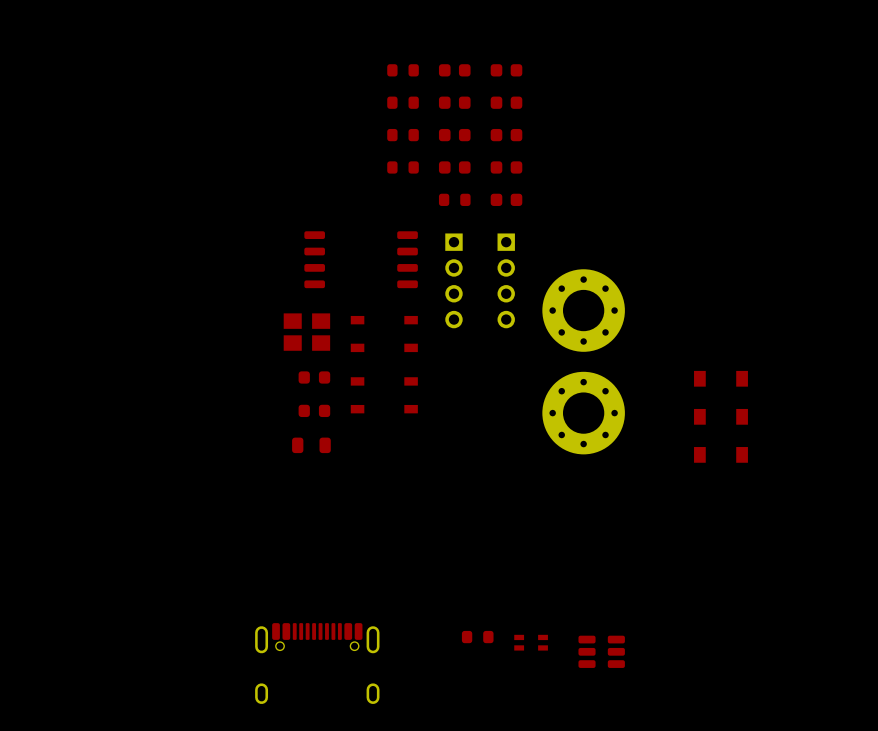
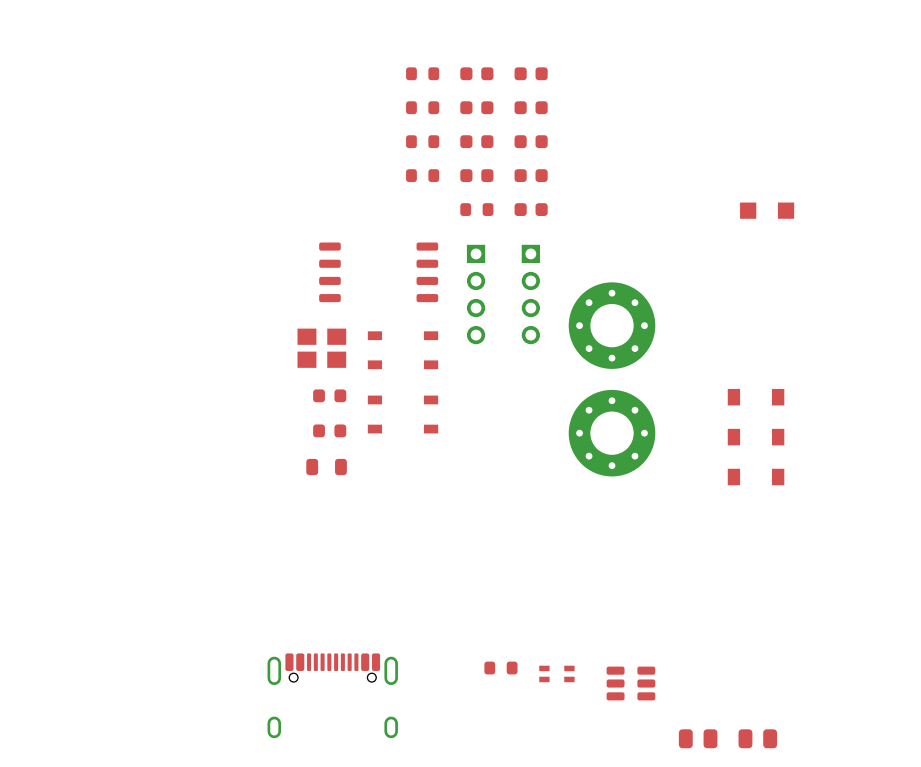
part: none -> (767, 210)
part: none -> (698, 738)
part: none -> (757, 738)

